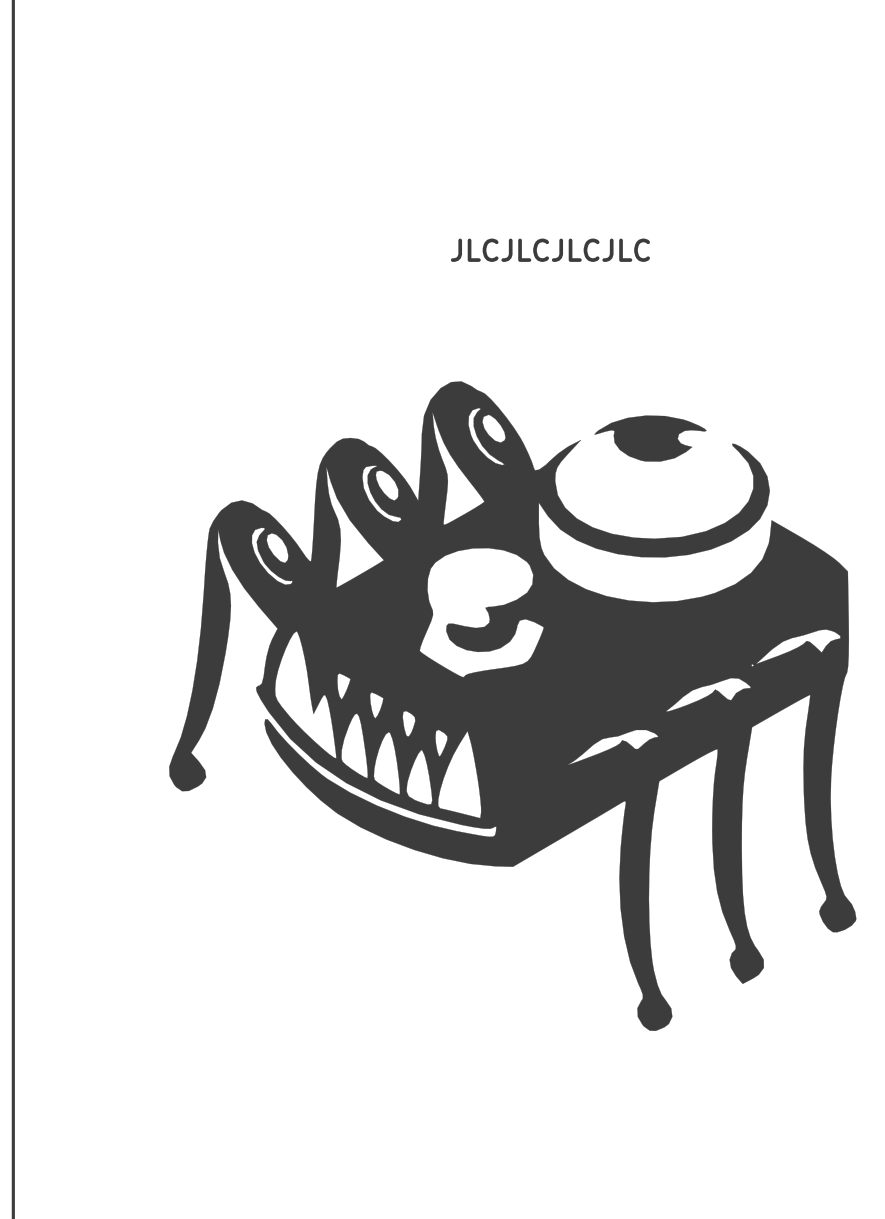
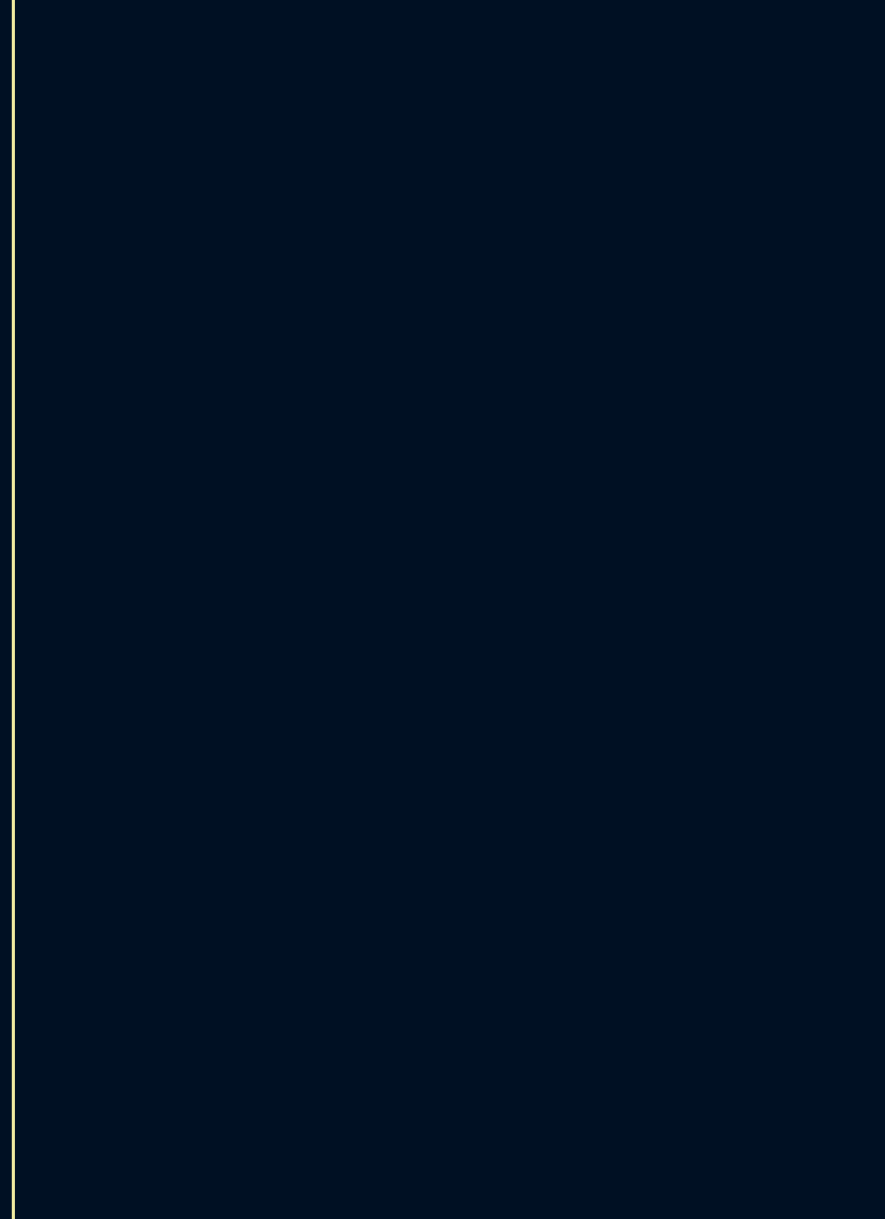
text: JLCJLCJLCJLC (550, 250) -> none
drawing: [169, 381, 857, 1031] -> none

